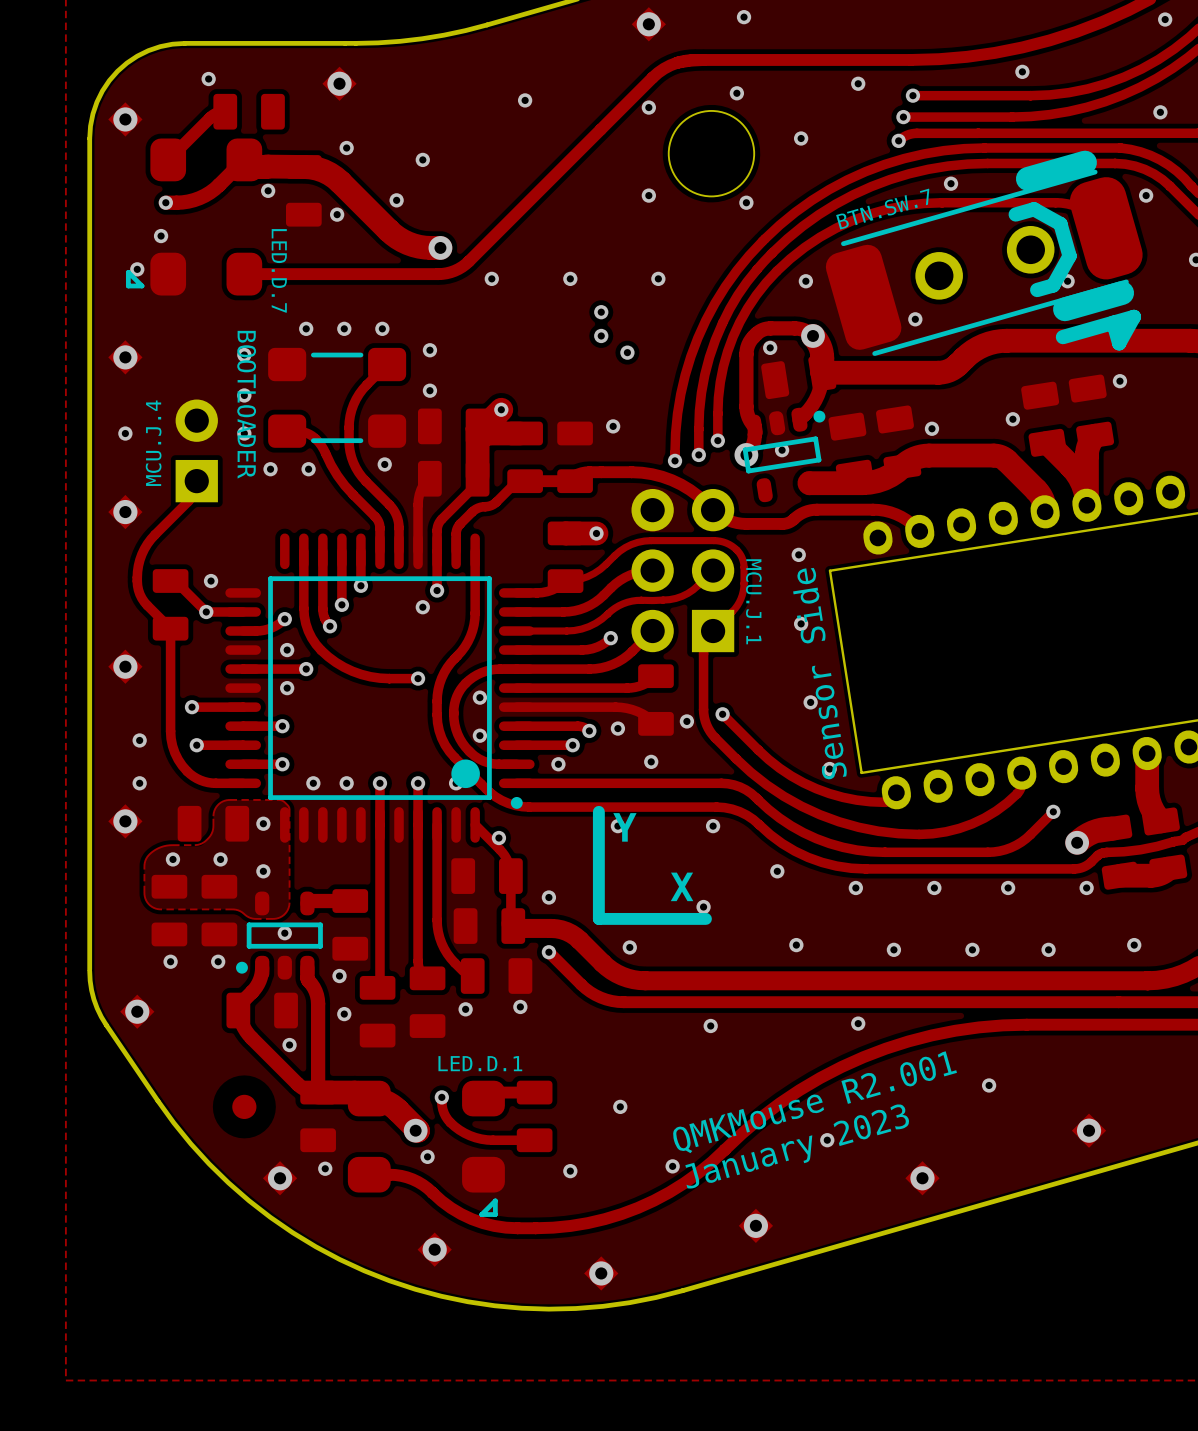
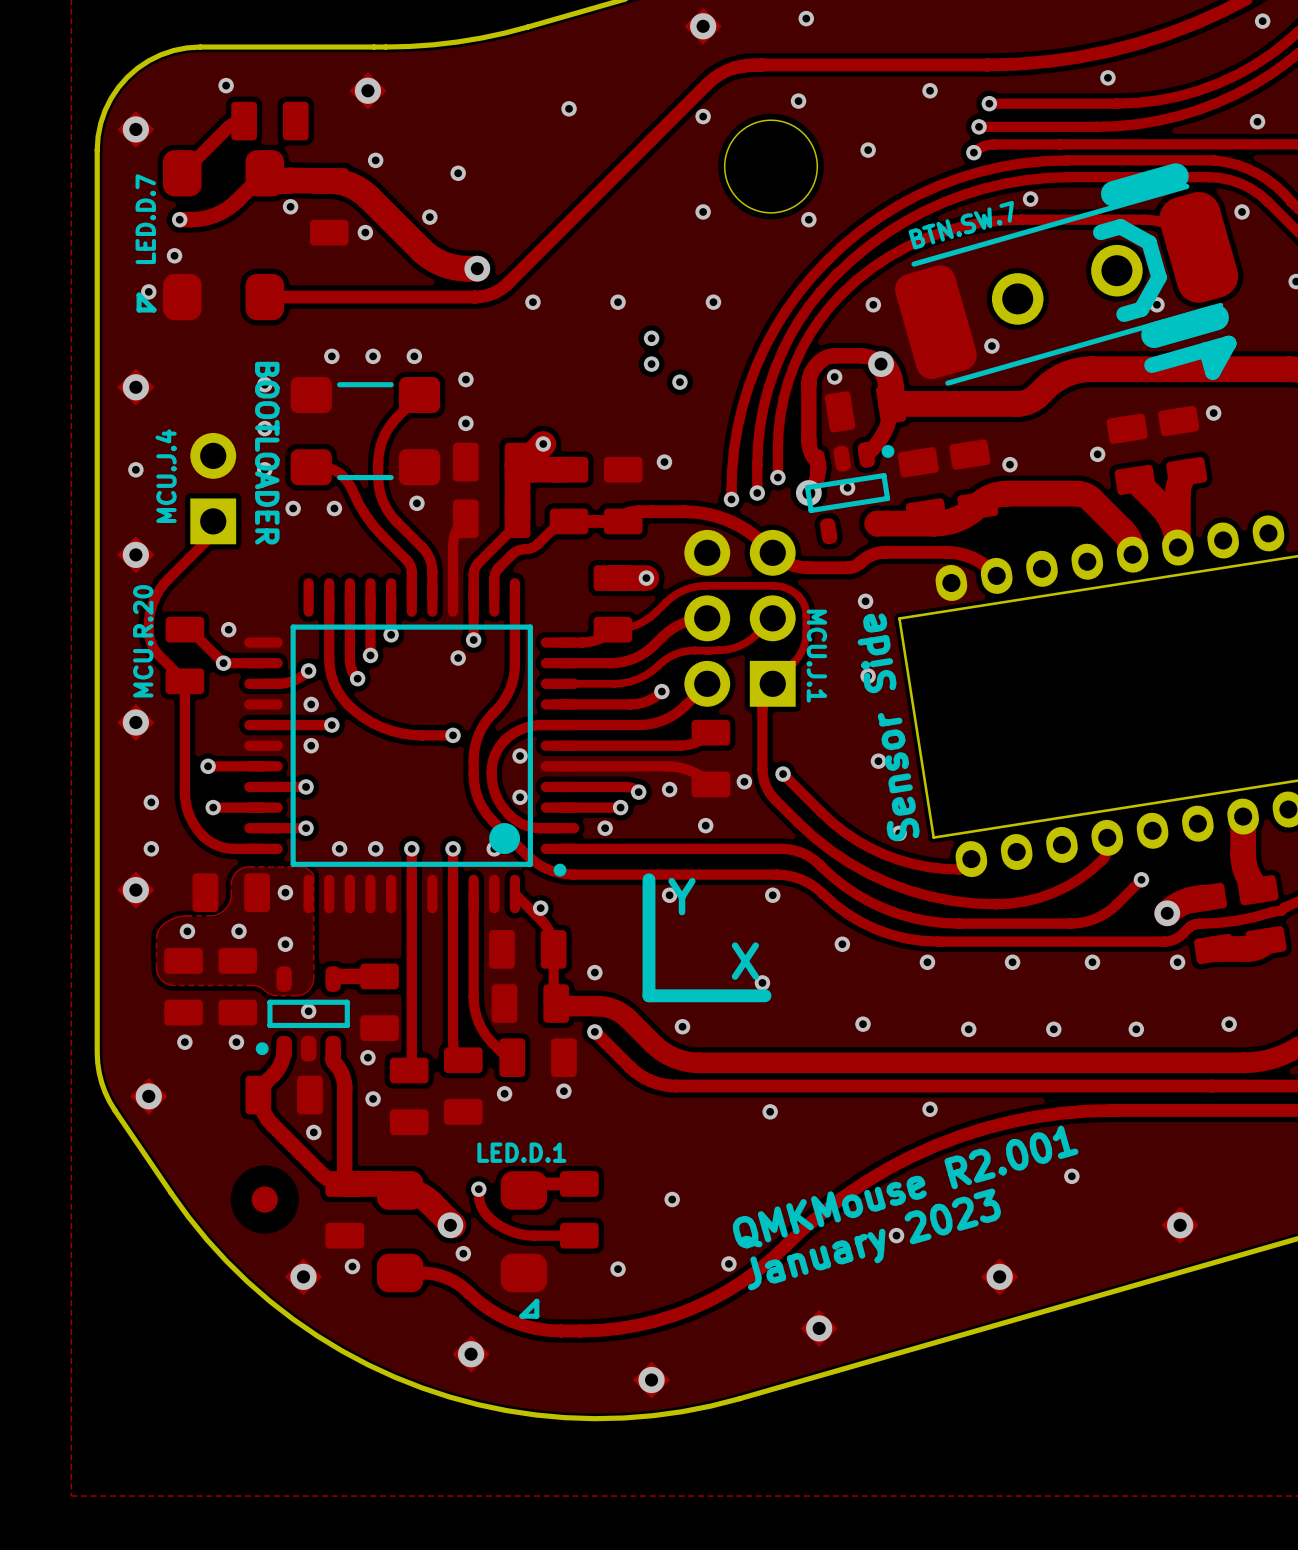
LED.D.7 name rotation: 0° (279, 270) -> 180° (145, 219)
LED.D.7 name position: LED.D.7 (279, 270) -> LED.D.7 (145, 219)
MCU.R.20 name: none -> MCU.R.20 (143, 641)

